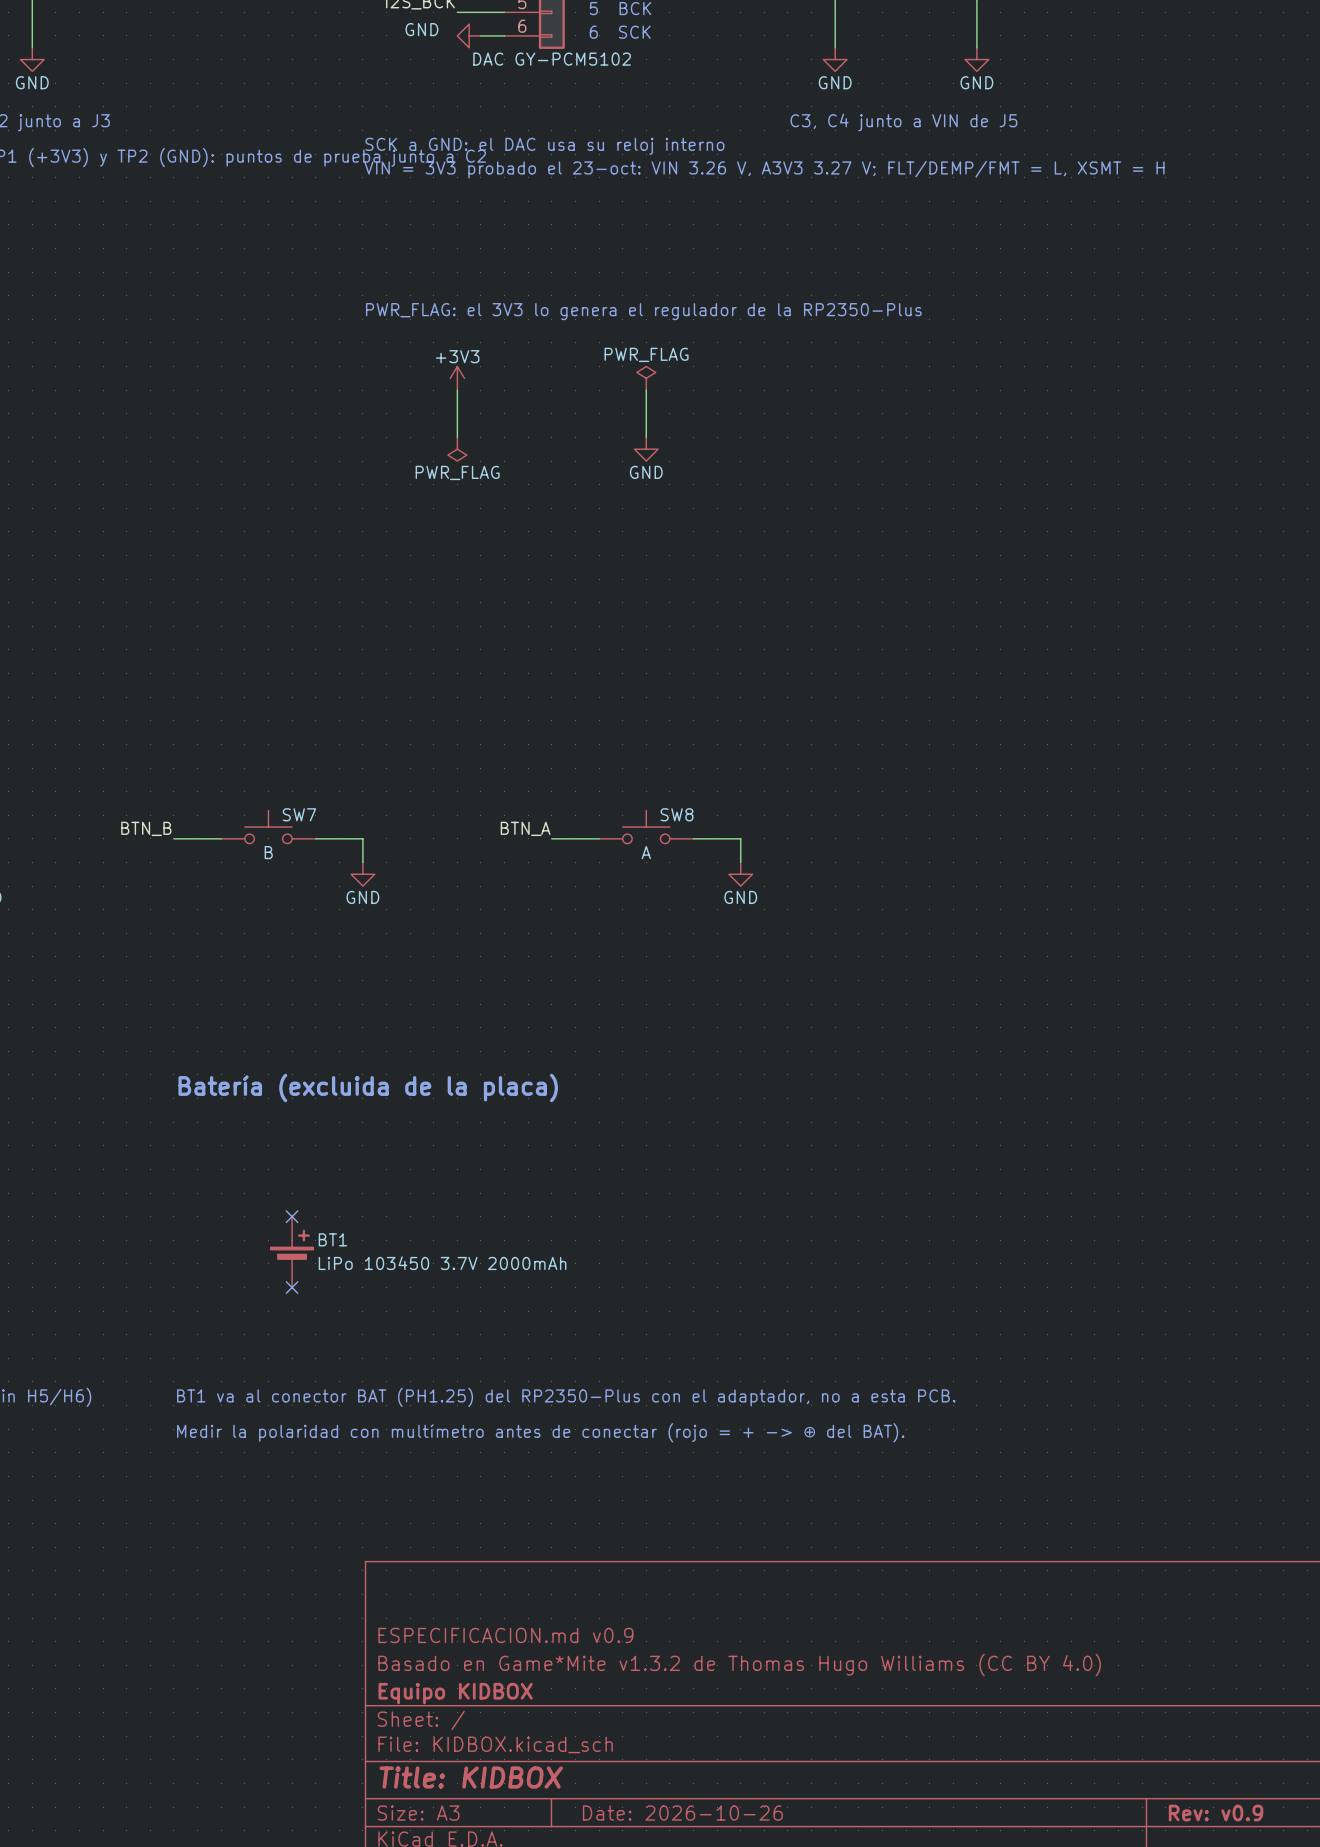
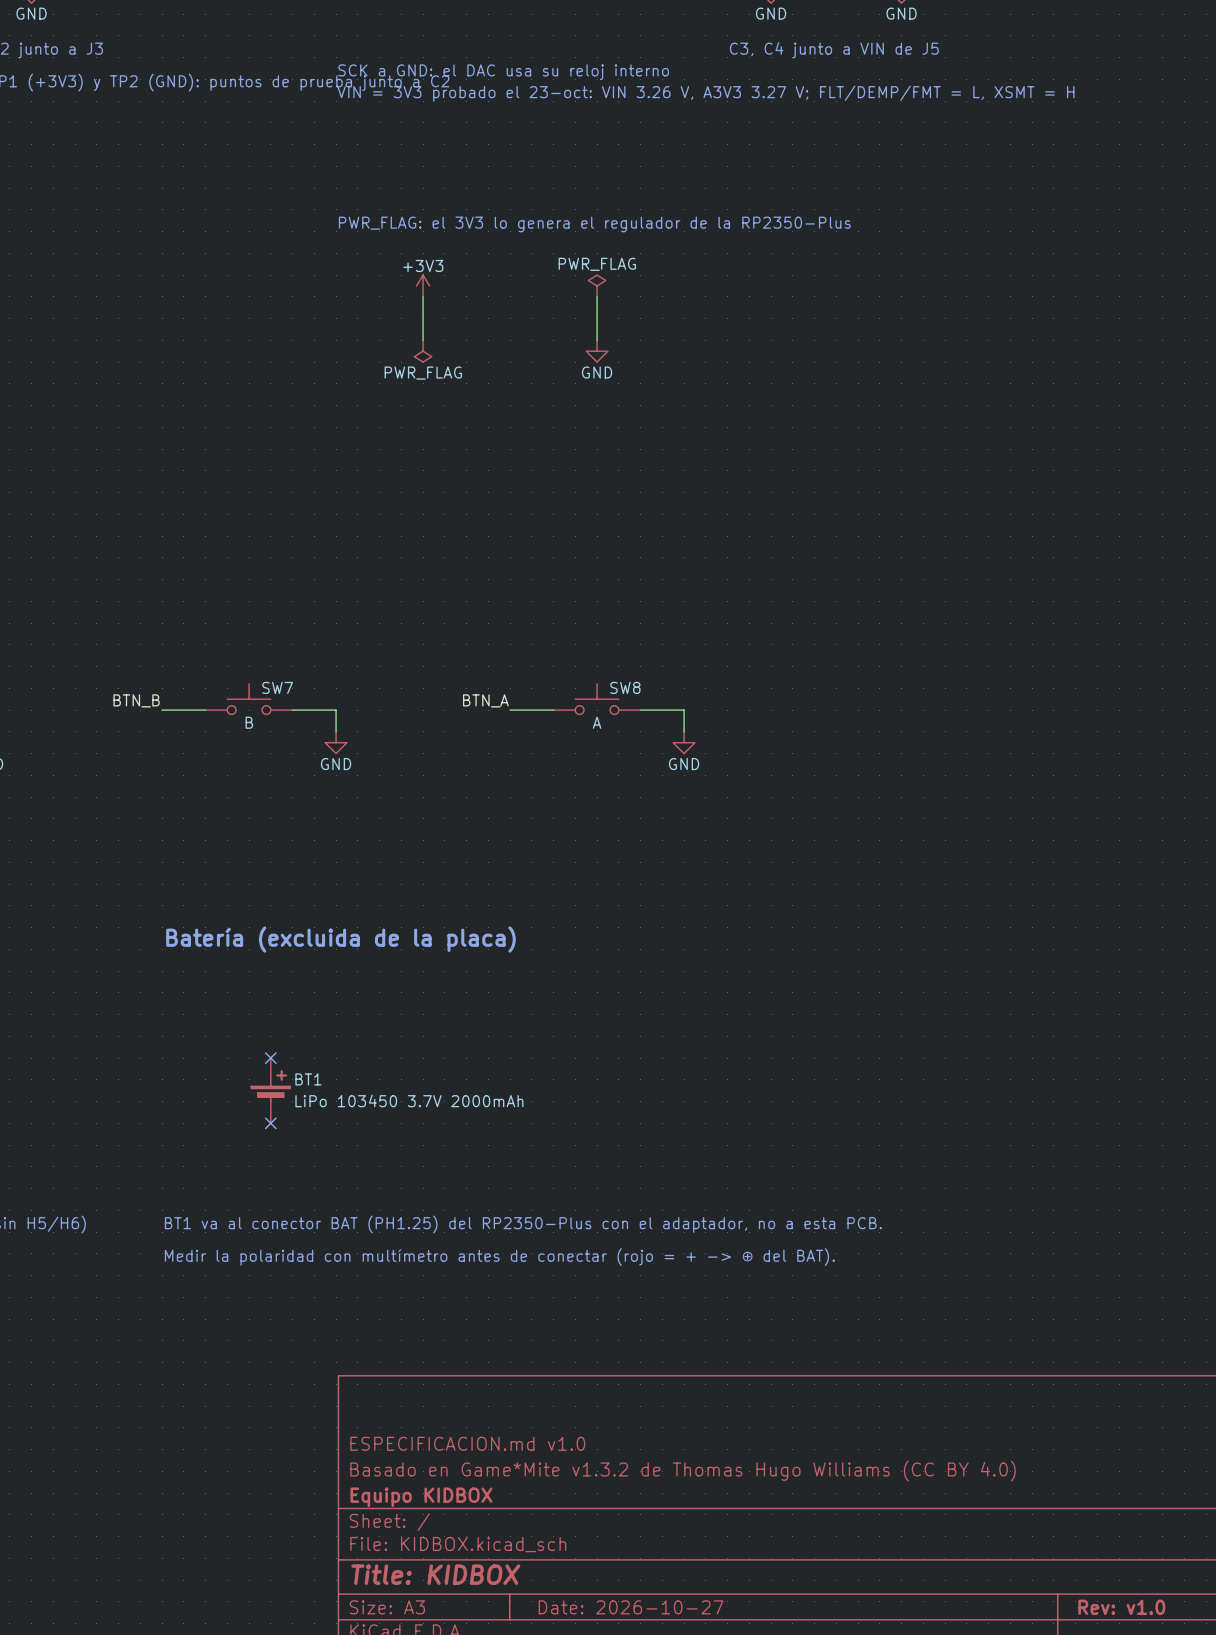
title block: ESPECIFICACION.md v0.9 (505, 1635) -> ESPECIFICACION.md v1.0 (467, 1443)
title block: Date: 2026-10-26 (682, 1813) -> Date: 2026-10-27 (631, 1607)
title block: Rev: v0.9 (1216, 1813) -> Rev: v1.0 (1121, 1607)

